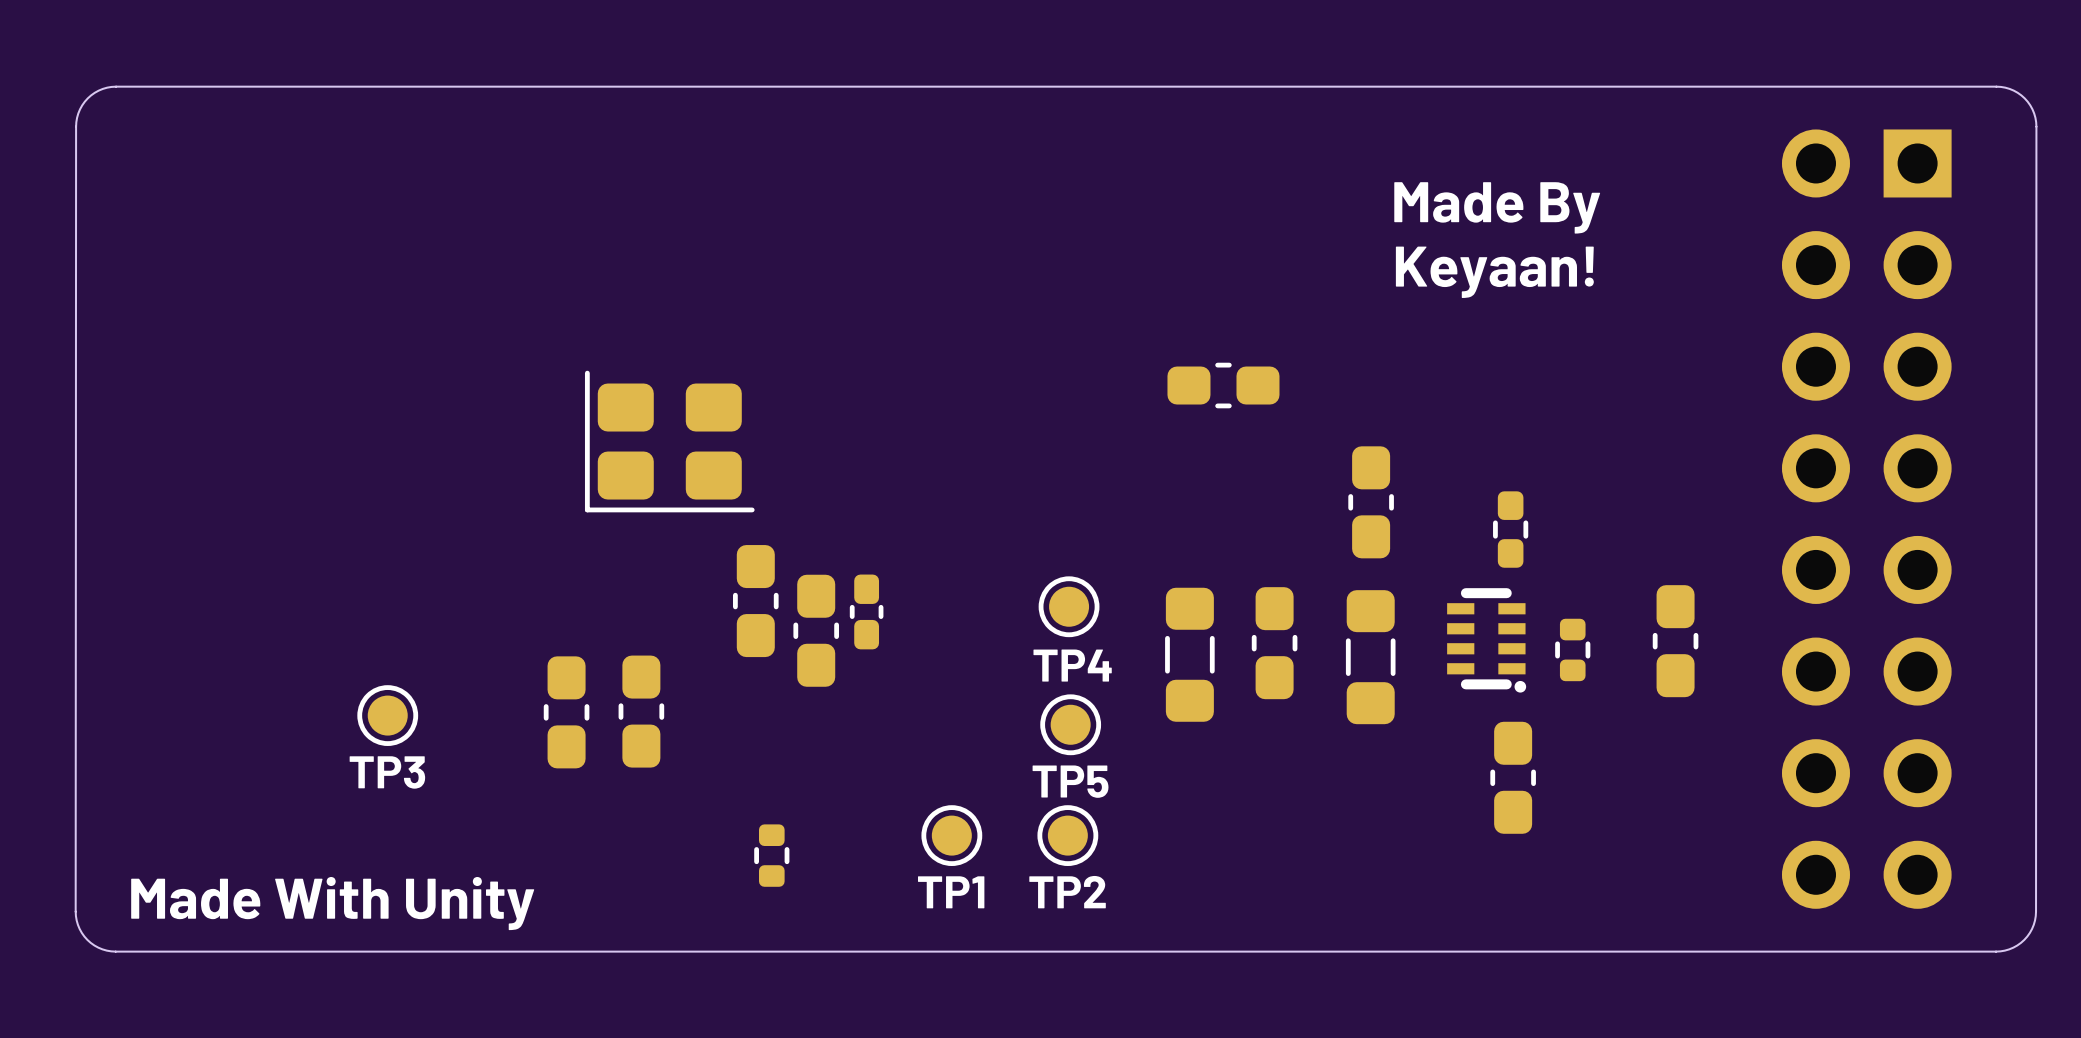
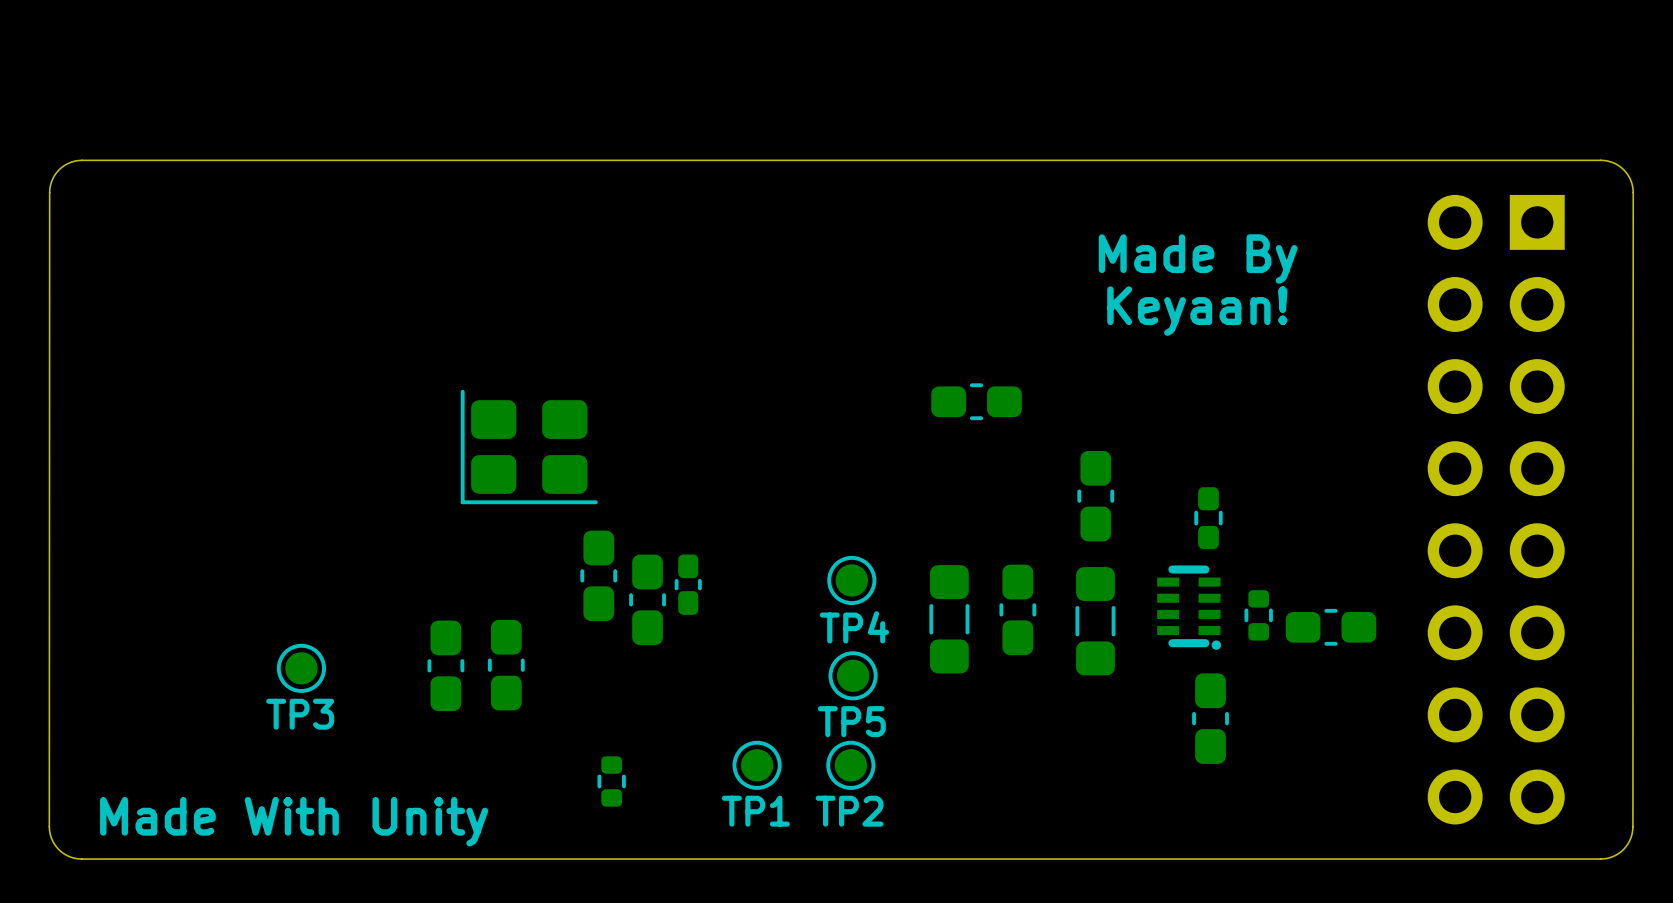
part rotation: 0° (1675, 641) -> 90° clockwise (1330, 627)

